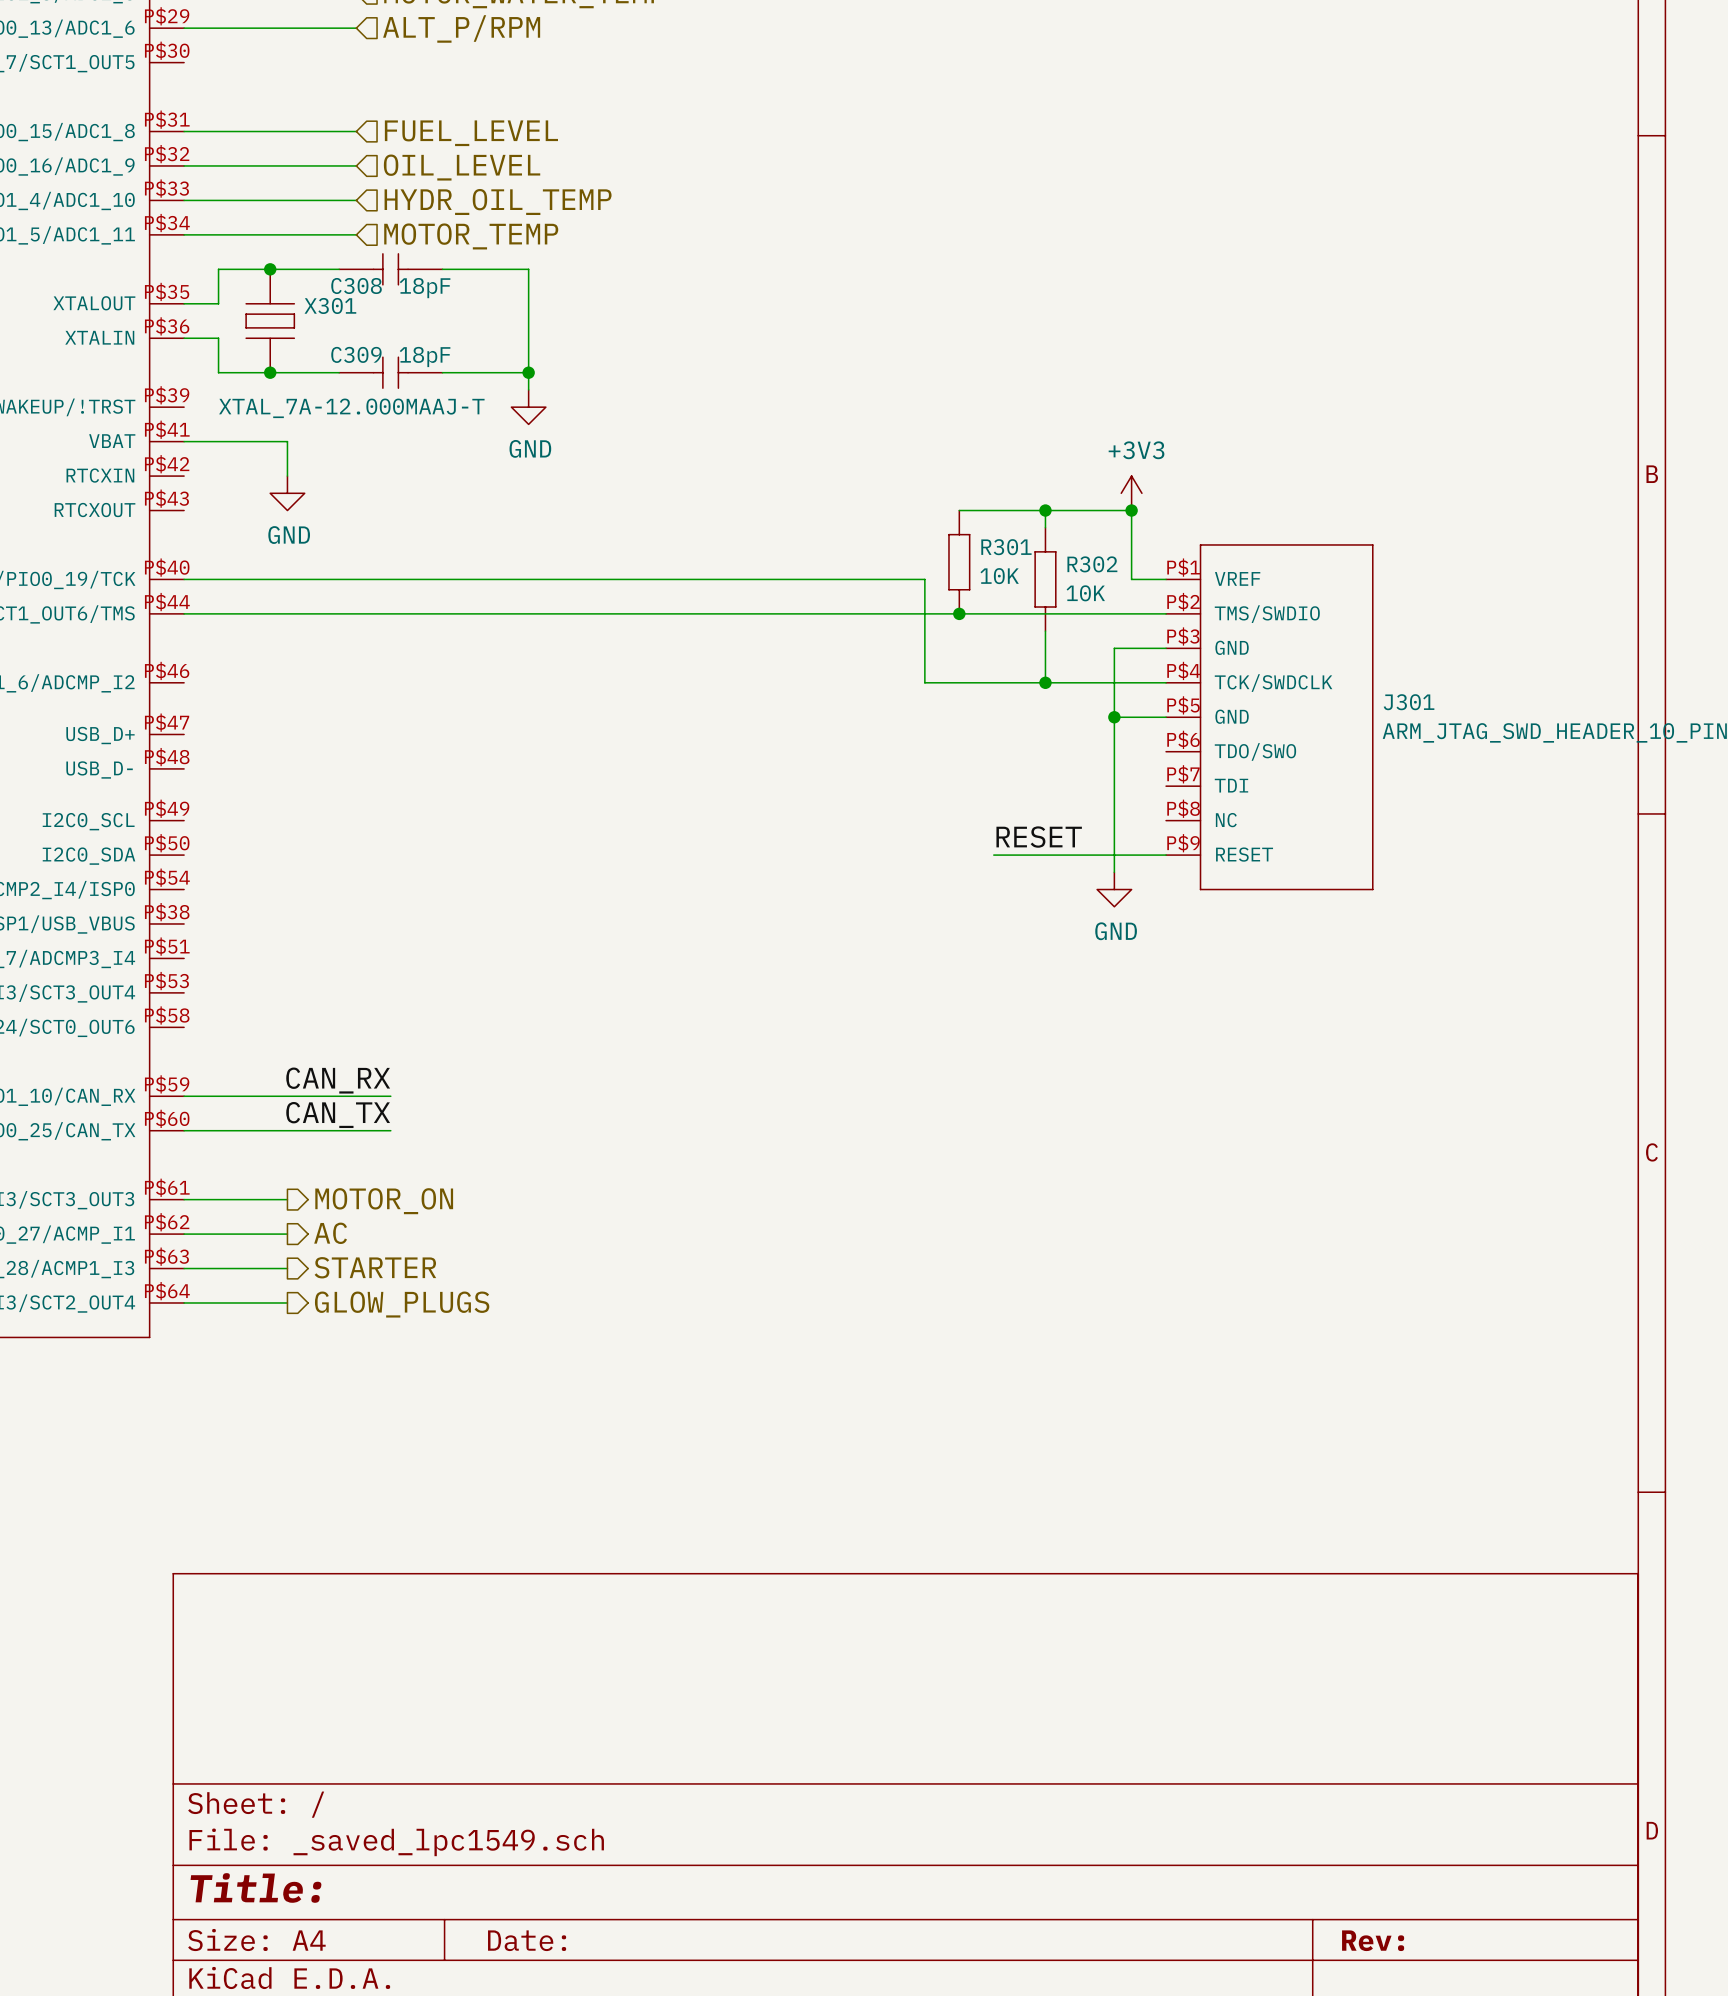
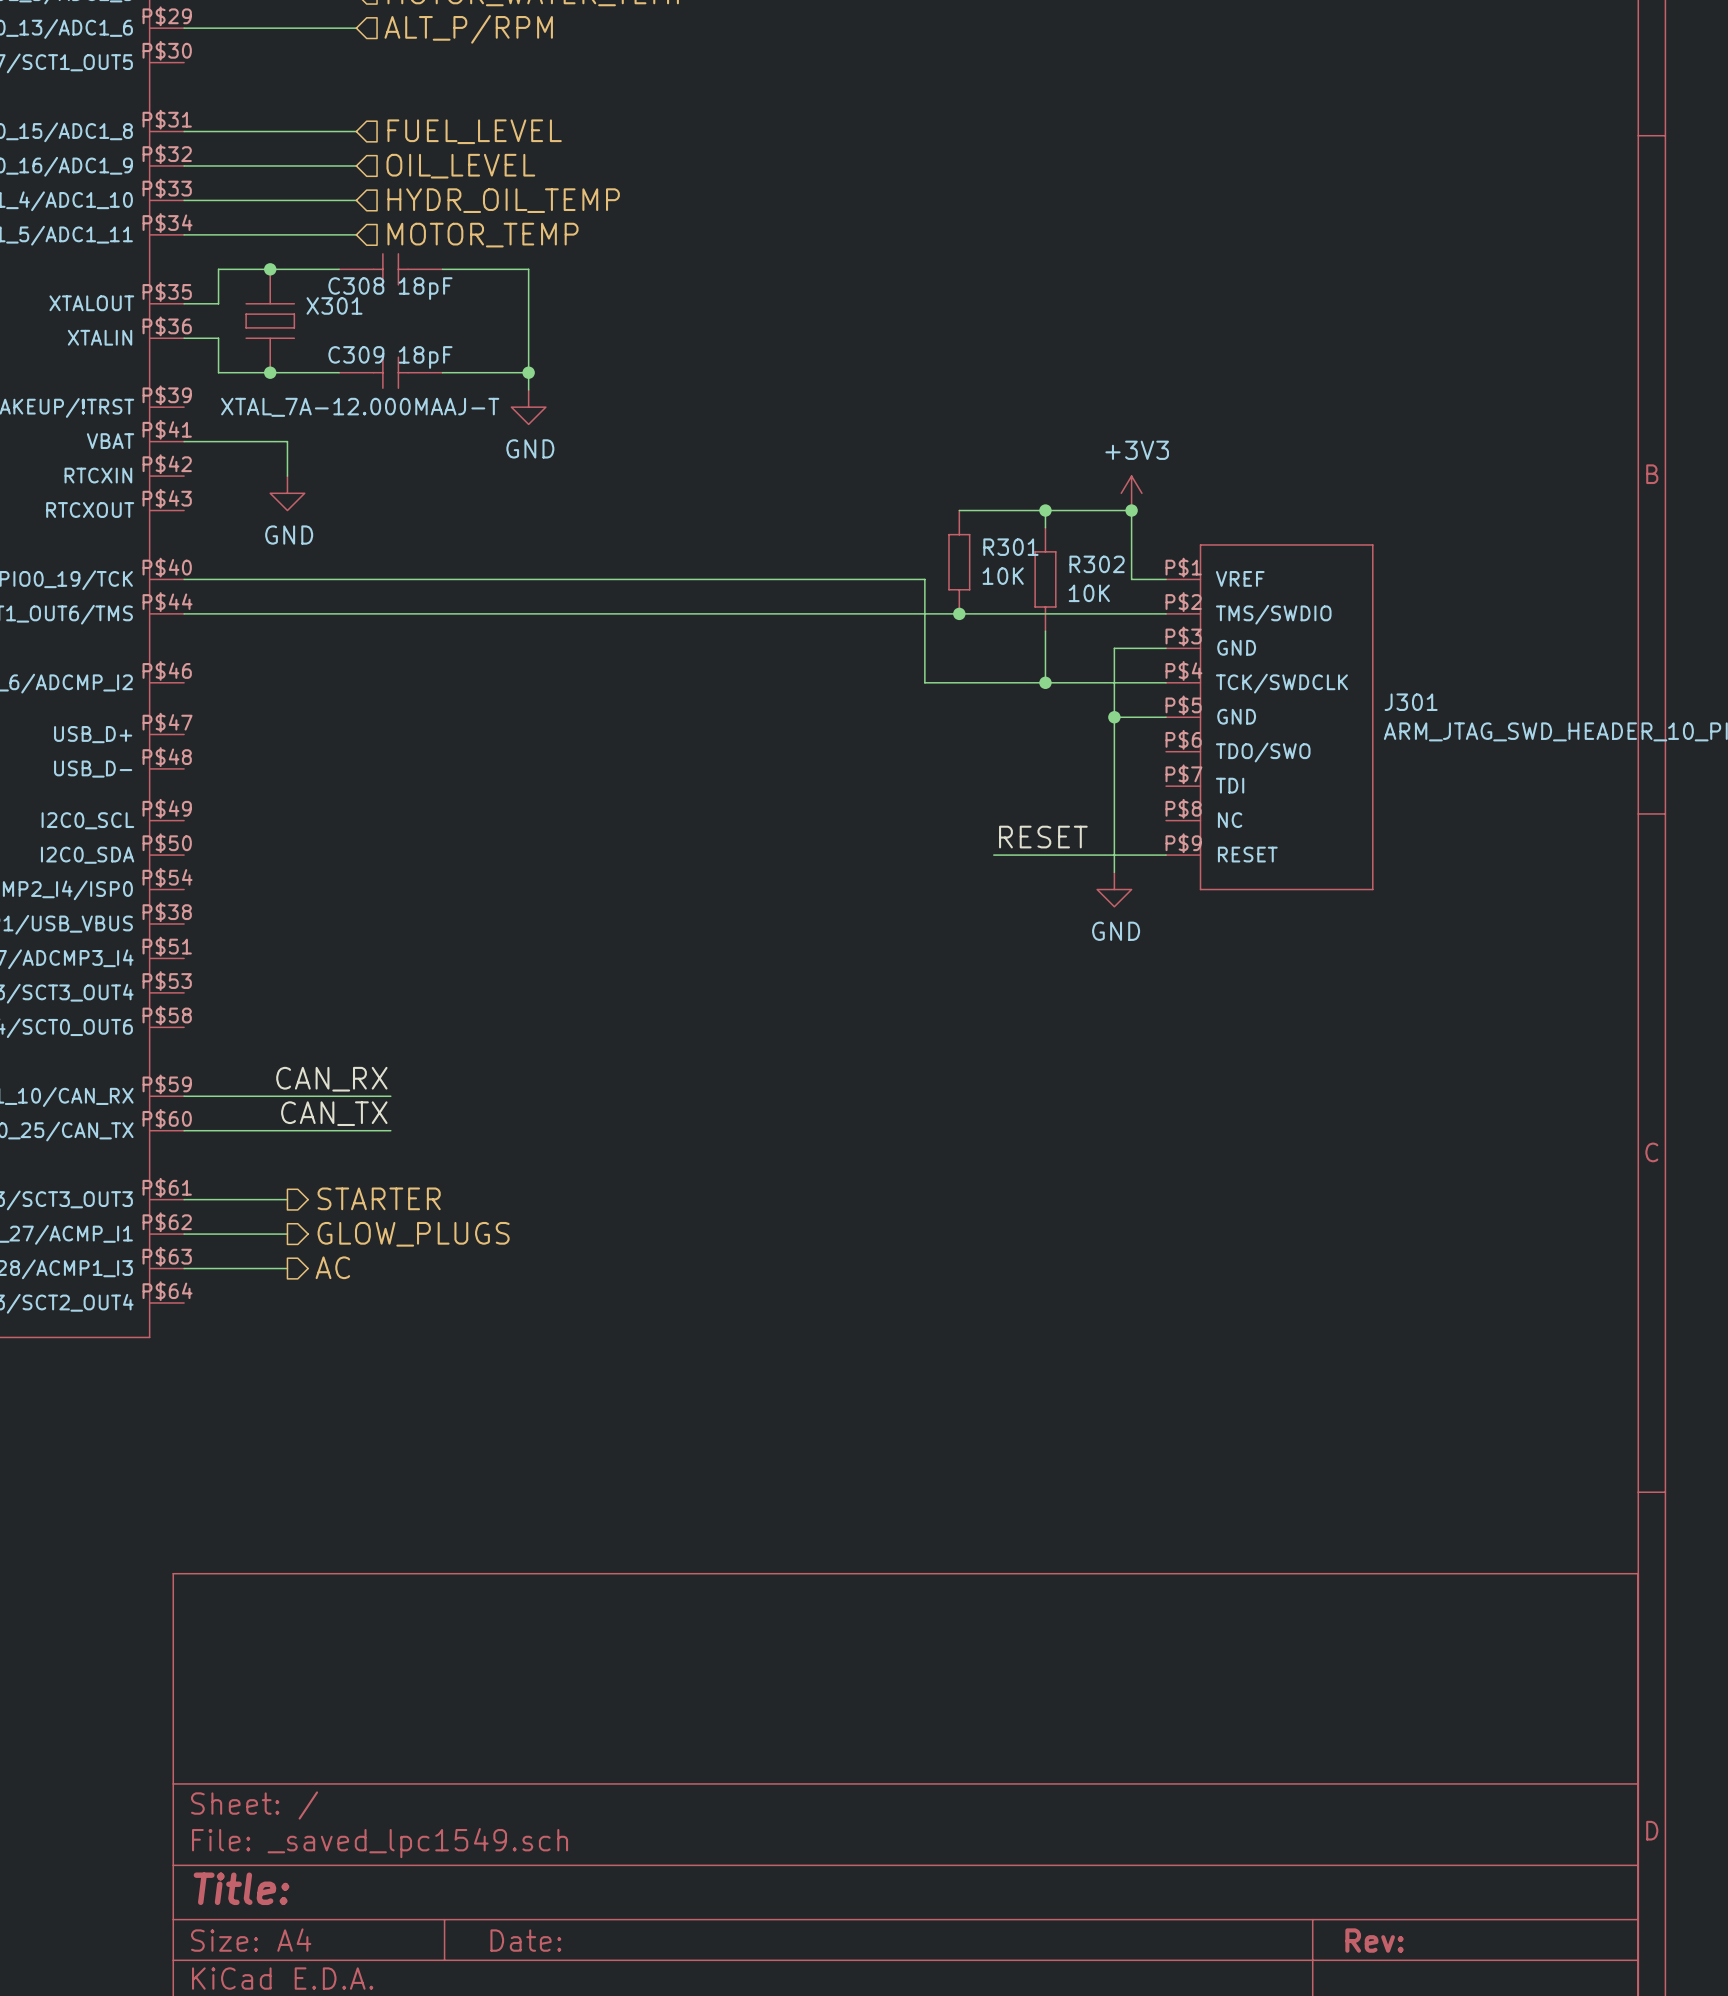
hierarchical label: MOTOR_ON (384, 1201) -> STARTER (379, 1198)
hierarchical label: AC (330, 1233) -> GLOW_PLUGS (413, 1234)
hierarchical label: STARTER (375, 1267) -> AC (332, 1267)
wire: (184, 1302) (287, 1302) -> none
hierarchical label: GLOW_PLUGS (402, 1304) -> none

